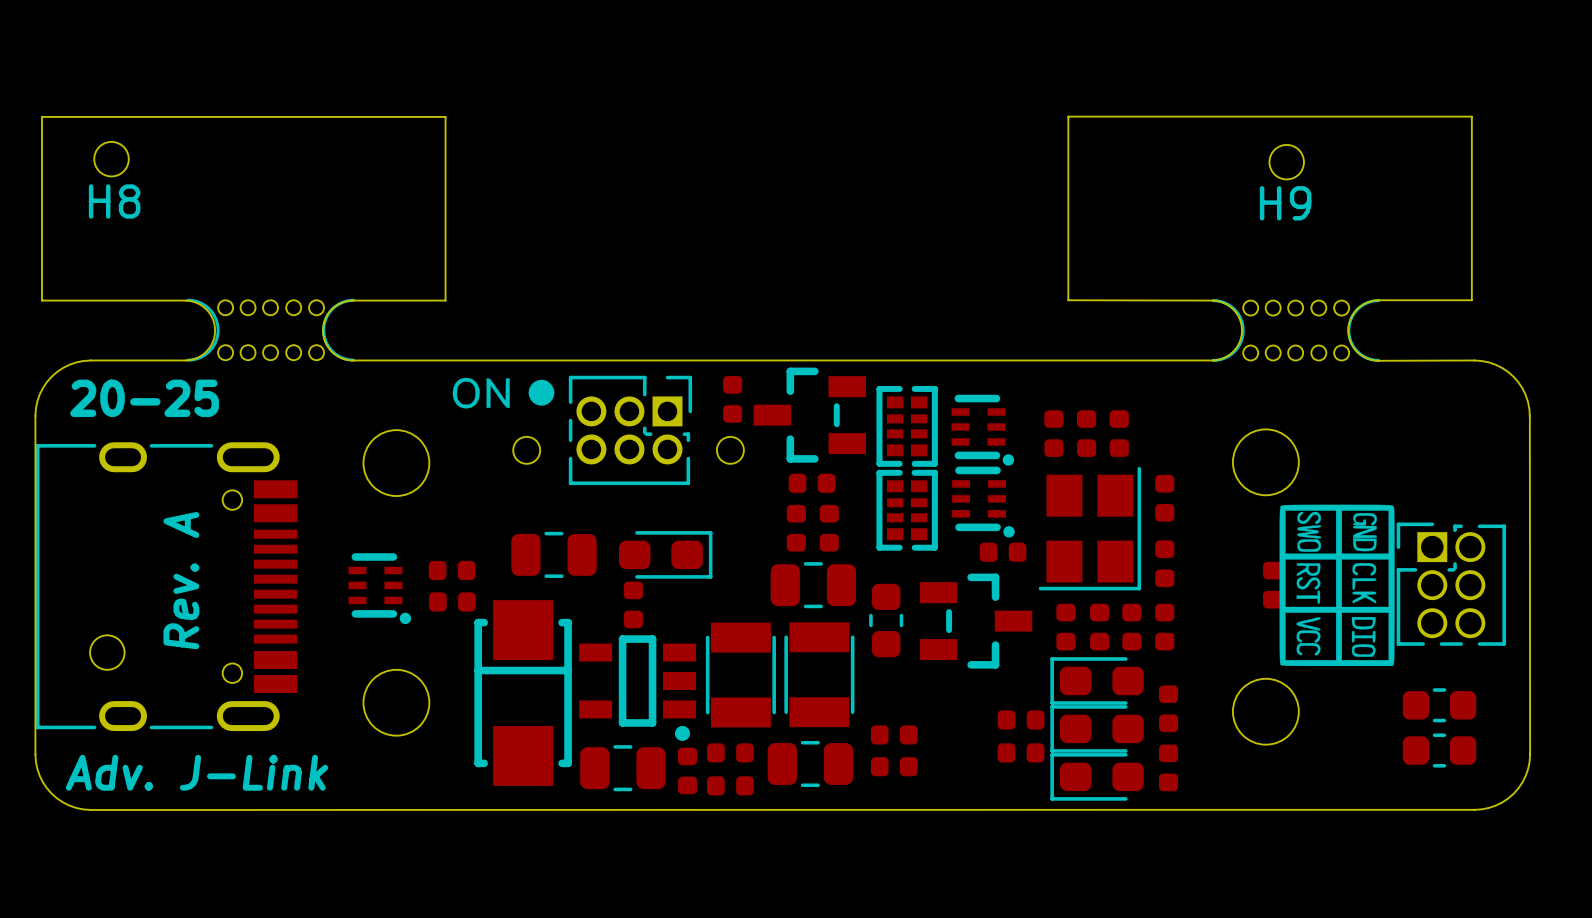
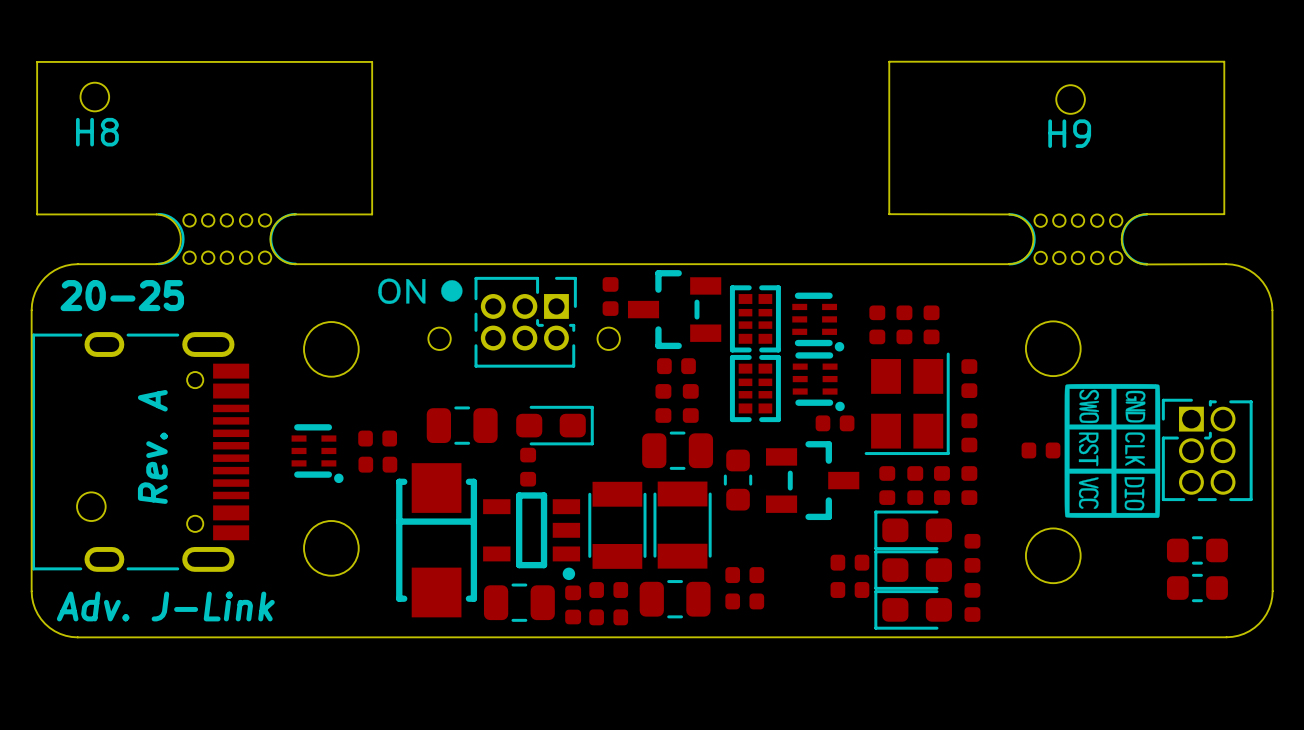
part rotation: 0° (1272, 585) -> 90° clockwise (1040, 450)

